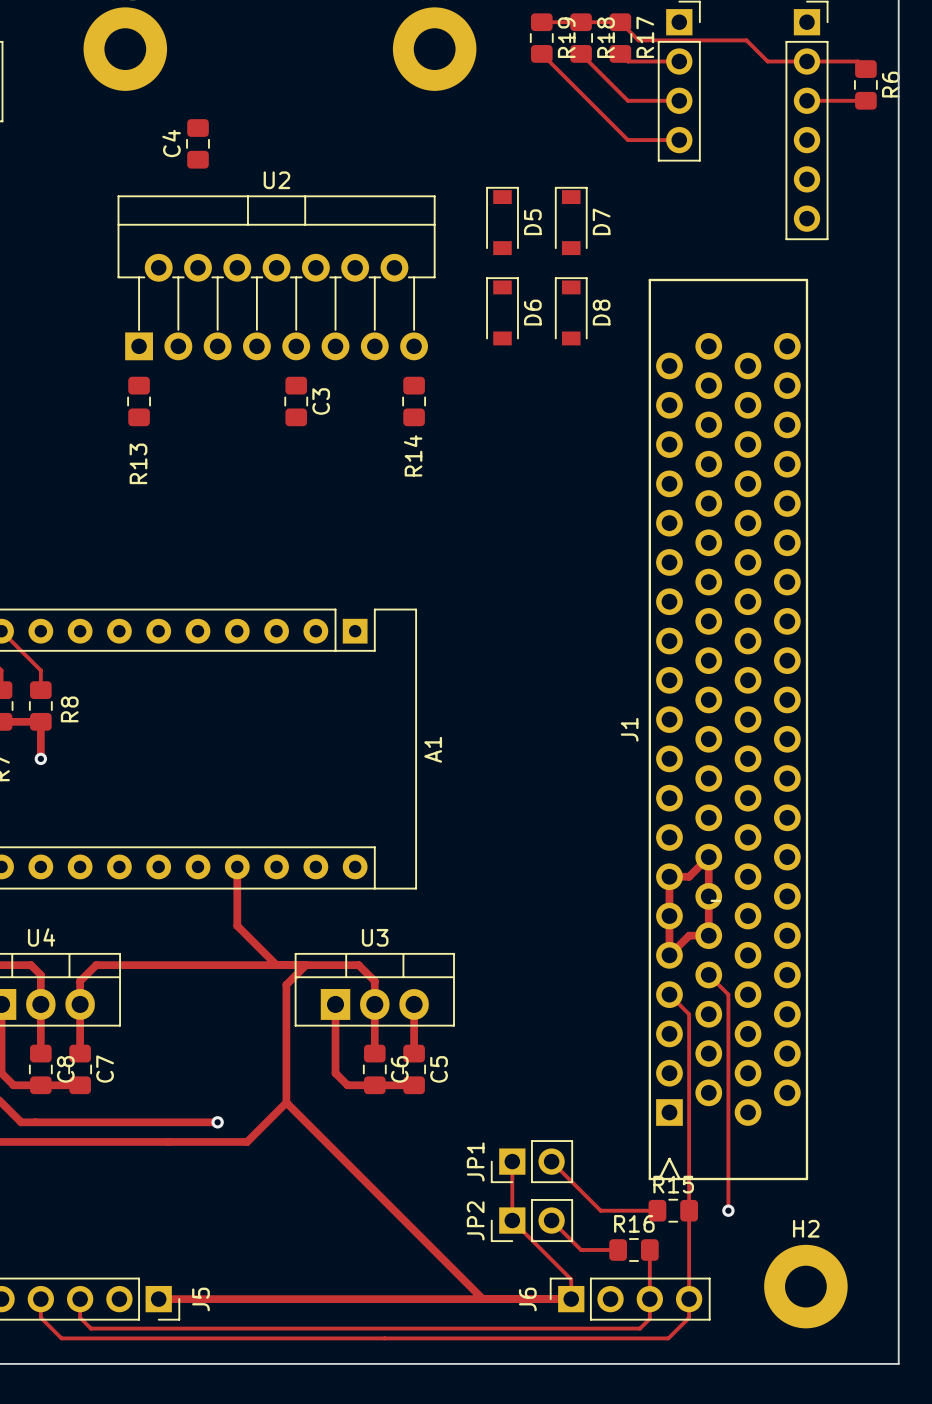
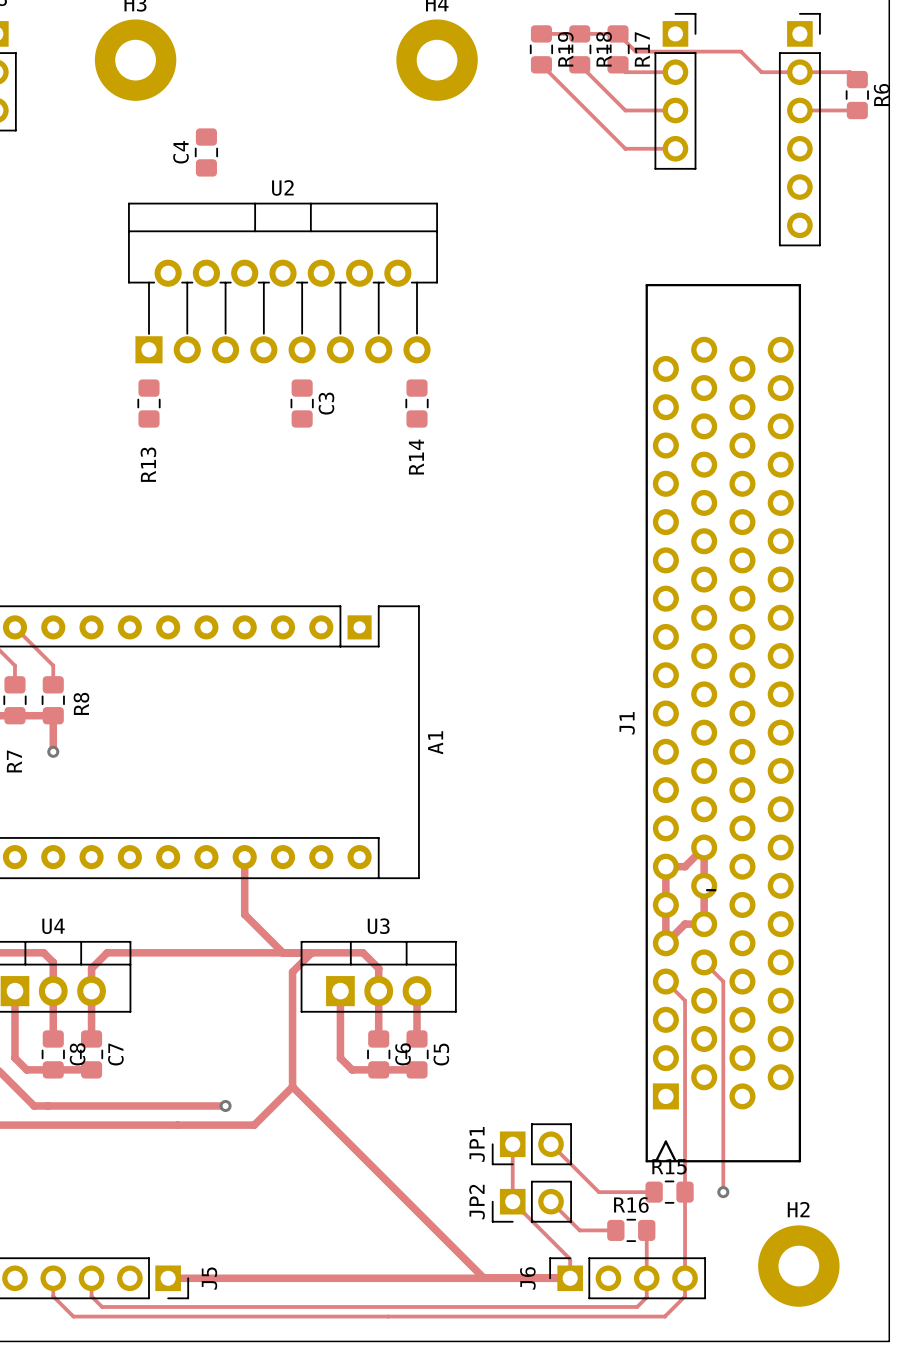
D5: (502, 220) -> none
D7: (571, 220) -> none
D6: (502, 311) -> none
D8: (571, 311) -> none

